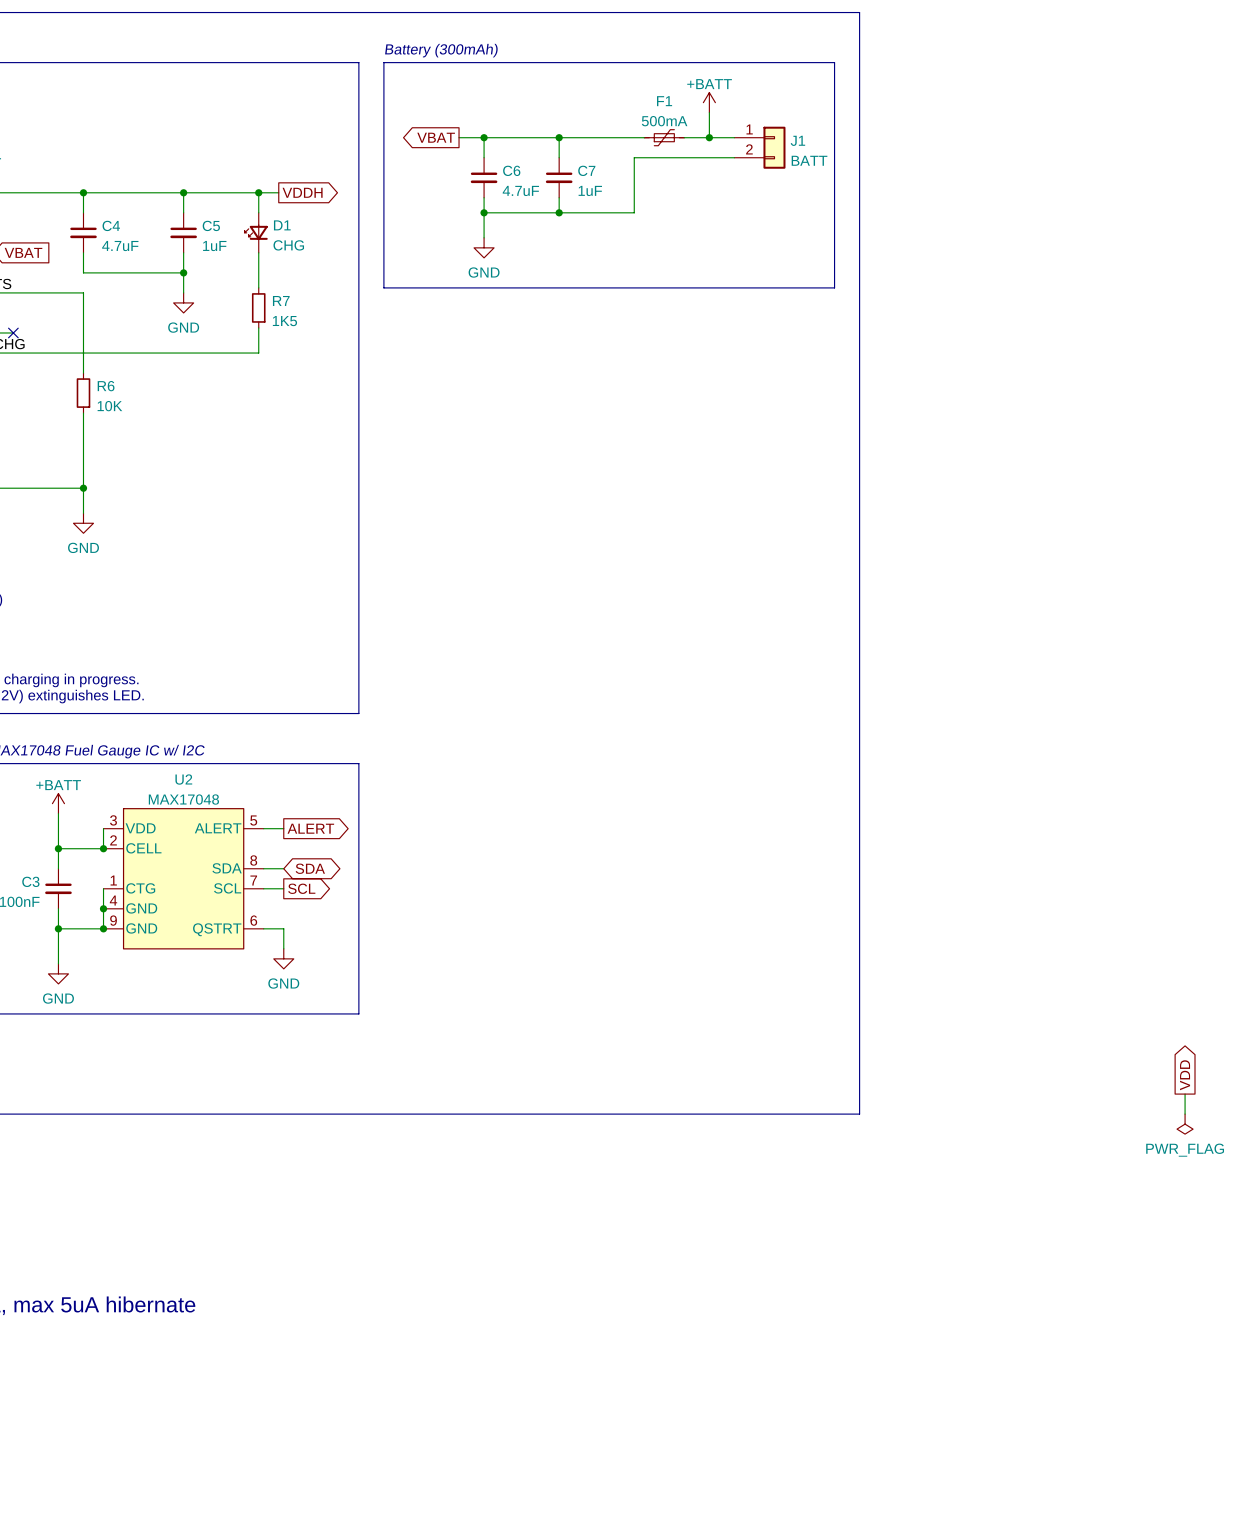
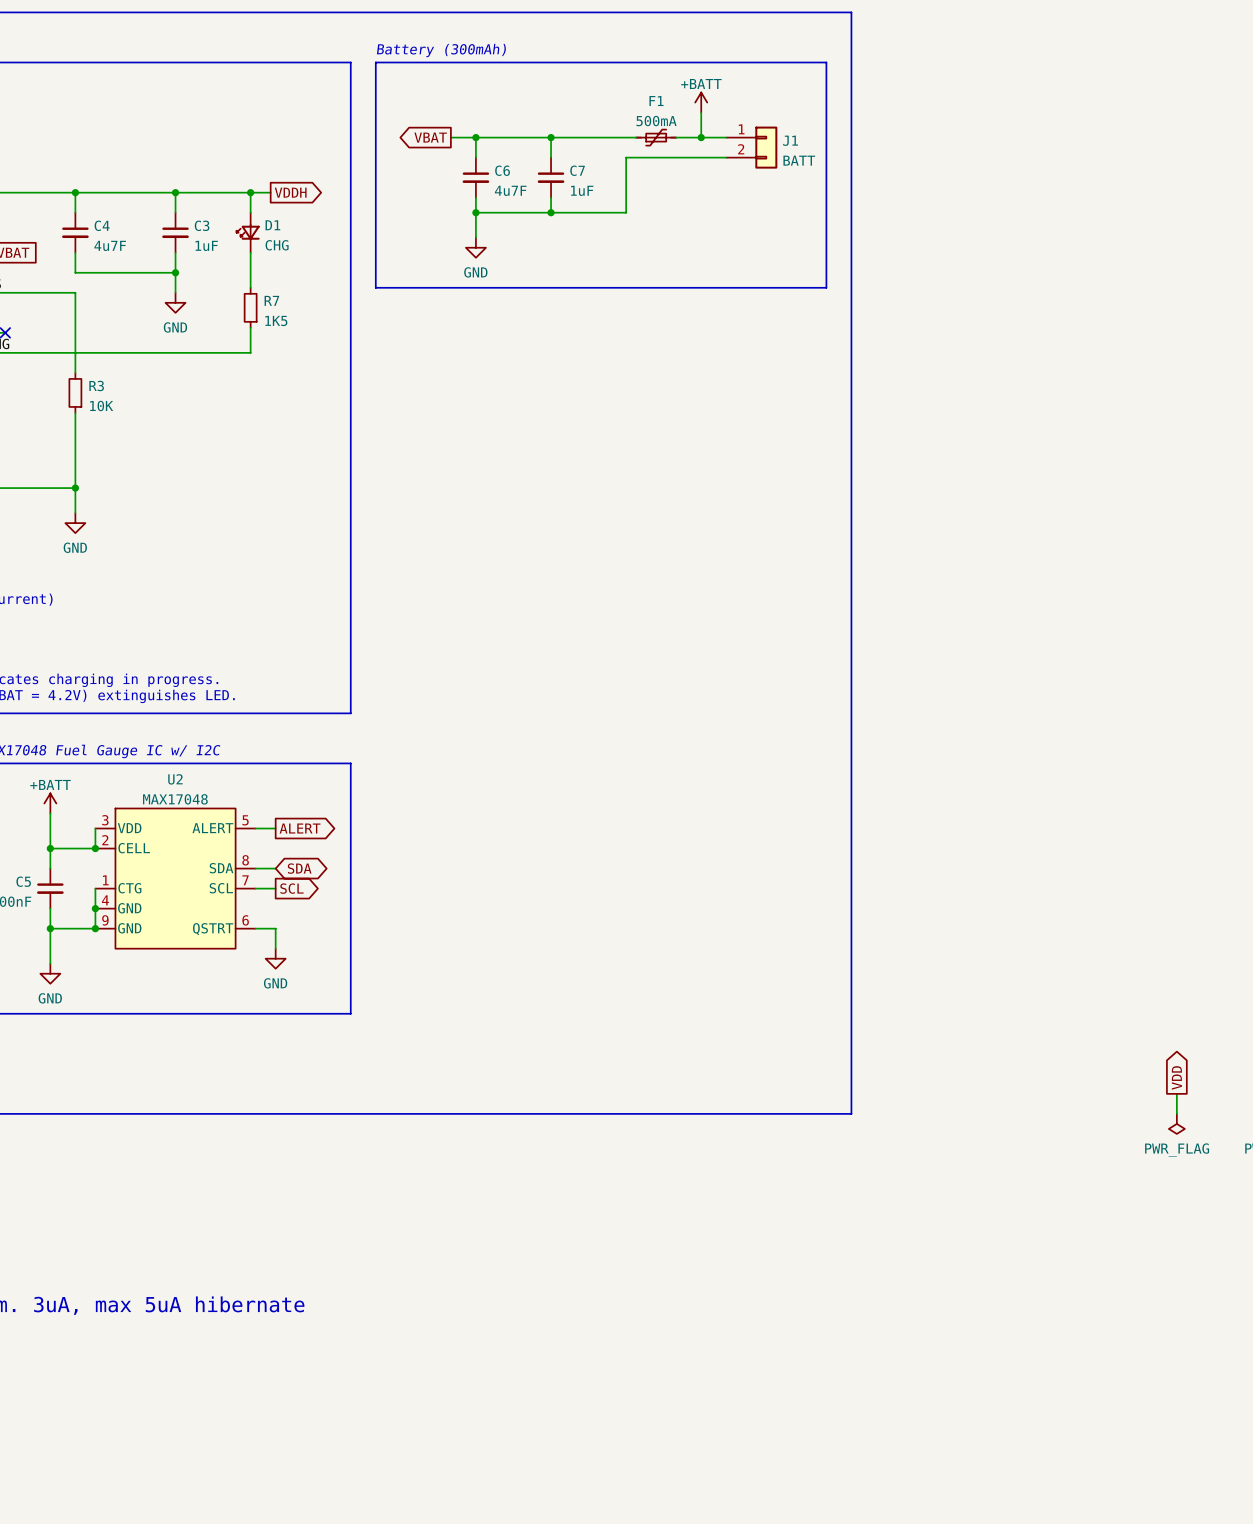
C6 value: 4.7uF (520, 190) -> 4u7F (510, 190)
C5 name: C5 (211, 225) -> C3 (202, 225)
C4 value: 4.7uF (120, 246) -> 4u7F (110, 245)
R6 name: R6 (106, 386) -> R3 (96, 385)
C3 name: C3 (30, 881) -> C5 (23, 881)

